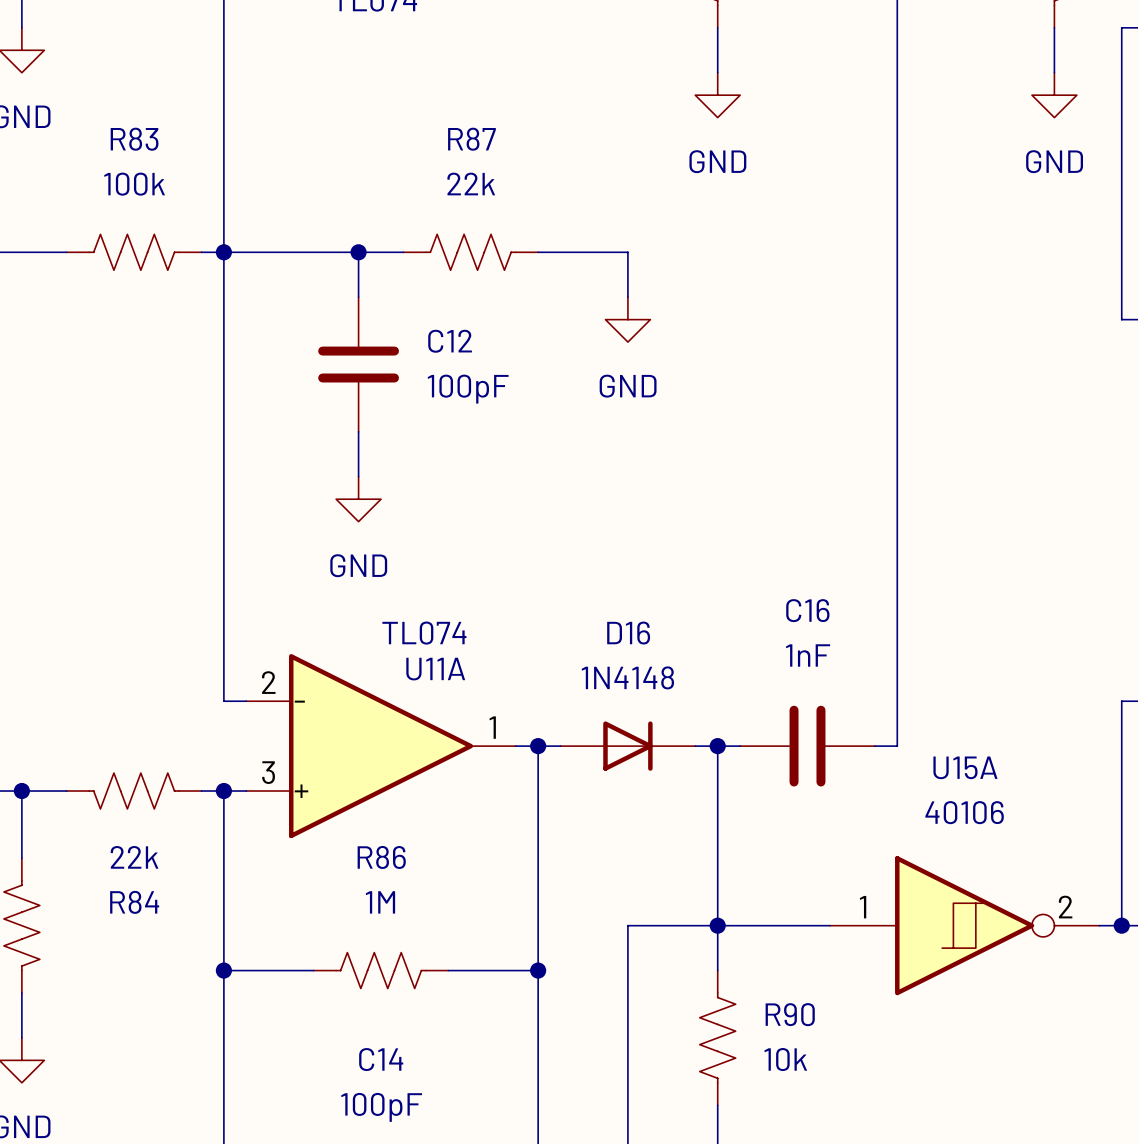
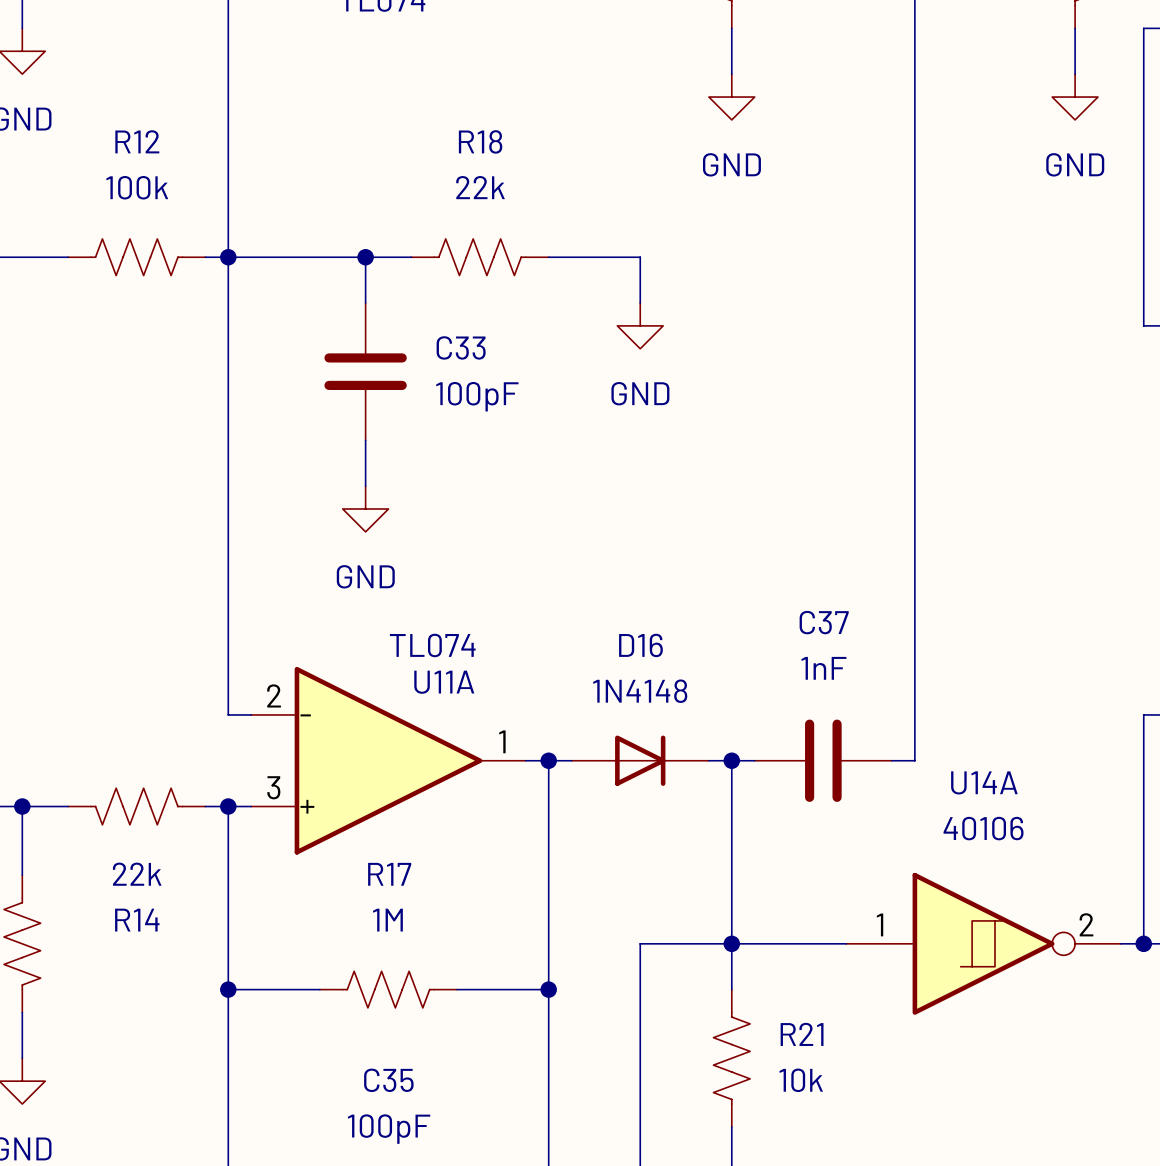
R83 name: R83 (134, 139) -> R12 (137, 141)
R87 name: R87 (471, 139) -> R18 (480, 141)
C12 name: C12 (450, 341) -> C33 (461, 347)
C16 name: C16 (807, 610) -> C37 (824, 622)
U15A name: U15A (965, 767) -> U14A (984, 782)
R86 name: R86 (381, 857) -> R17 (389, 874)
R84 name: R84 (134, 902) -> R14 (137, 920)
R90 name: R90 (790, 1014) -> R21 (802, 1034)
C14 name: C14 (381, 1059) -> C35 (388, 1080)

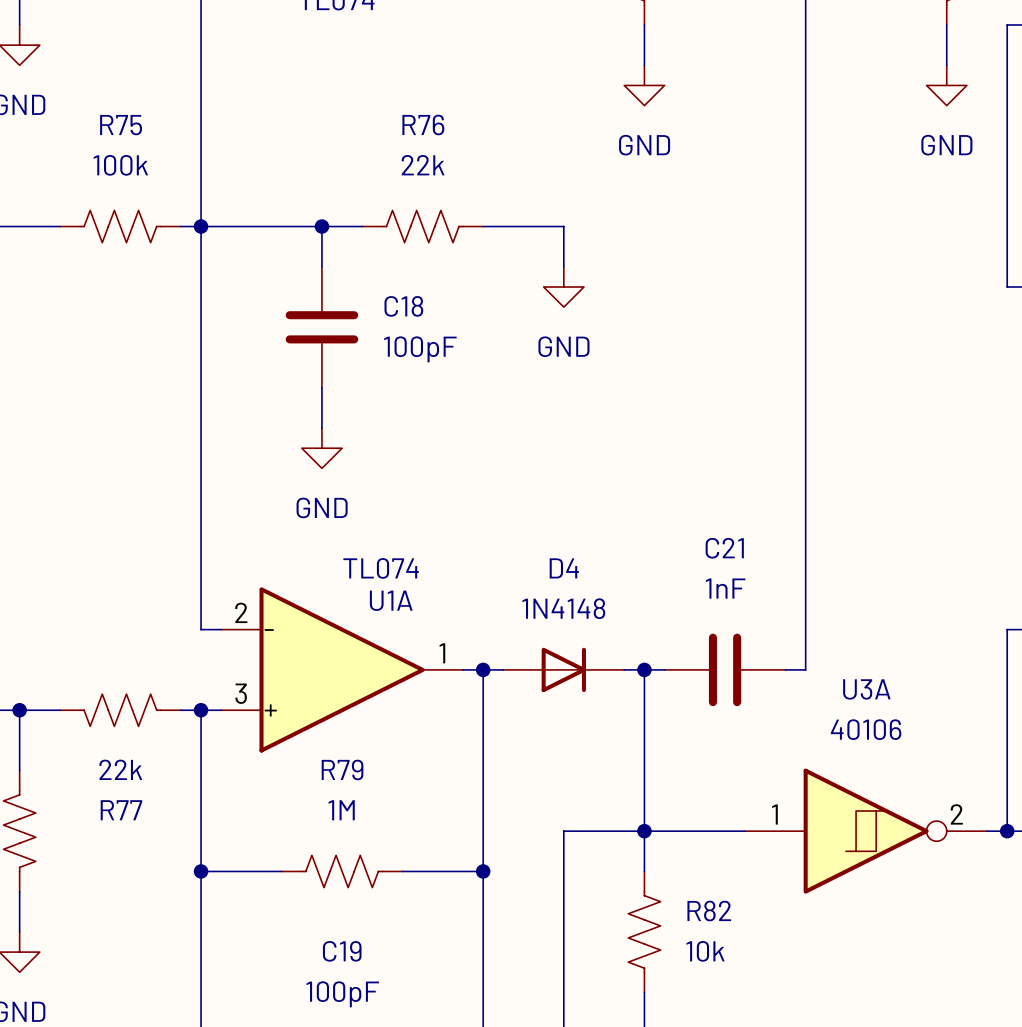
R12 name: R12 (137, 141) -> R75 (121, 125)
R18 name: R18 (480, 141) -> R76 (423, 124)
C33 name: C33 (461, 347) -> C18 (403, 306)
C37 name: C37 (824, 622) -> C21 (724, 548)
D16 name: D16 (640, 645) -> D4 (564, 568)
U11A name: U11A (444, 682) -> U1A (391, 600)
U14A name: U14A (984, 782) -> U3A (866, 689)
R17 name: R17 (389, 874) -> R79 (342, 769)
R14 name: R14 (137, 920) -> R77 (121, 810)
R21 name: R21 (802, 1034) -> R82 (709, 910)
C35 name: C35 (388, 1080) -> C19 (342, 951)

